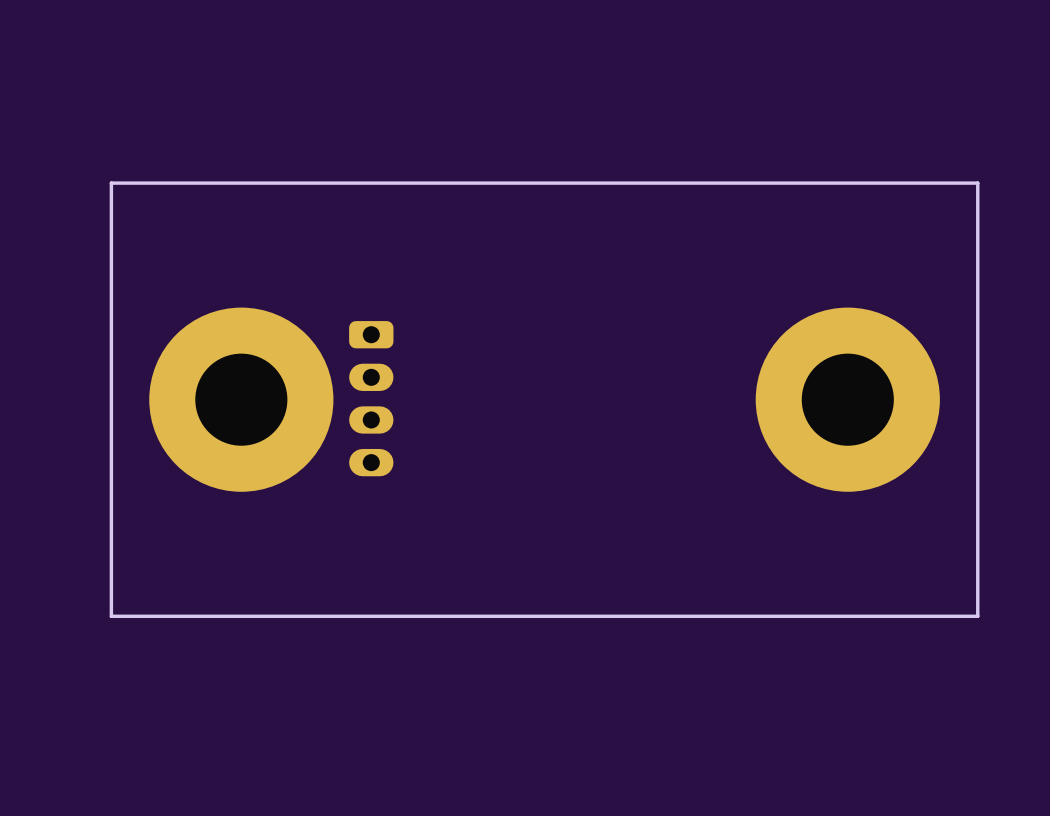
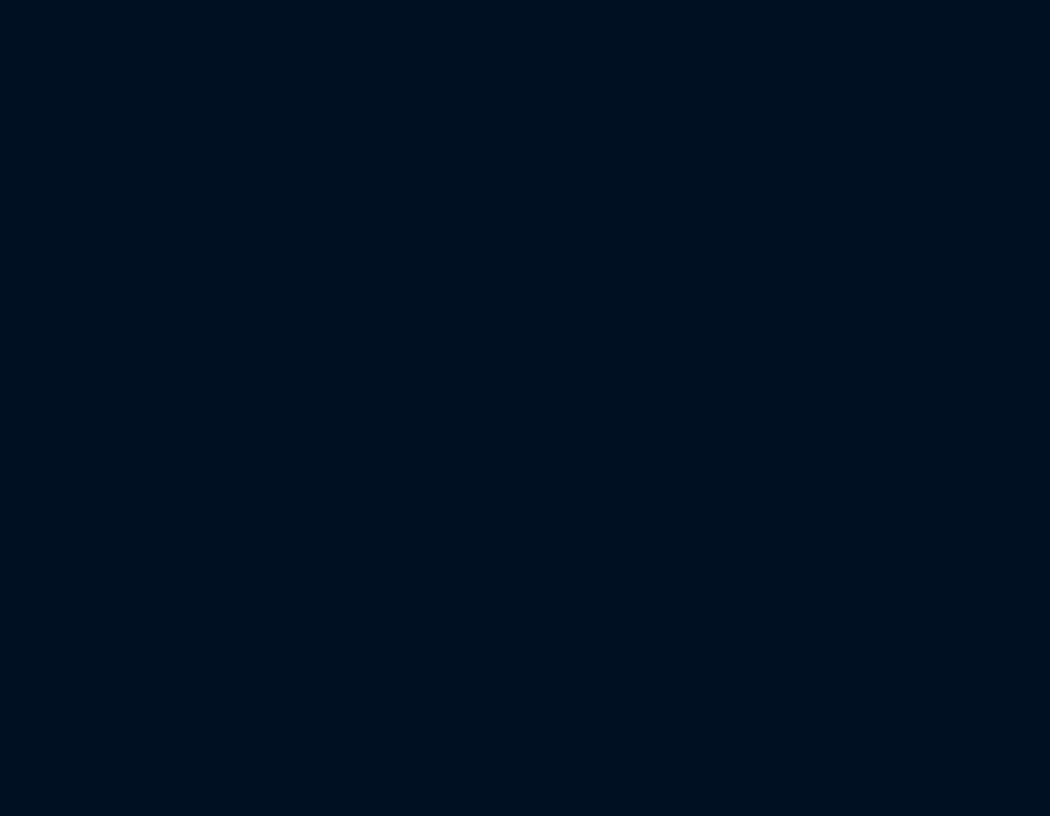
board edge: (977, 183) (977, 616) (111, 616) (111, 183) (977, 183) -> none
part: (371, 398) -> none
part: (241, 399) -> none
part: (847, 399) -> none

